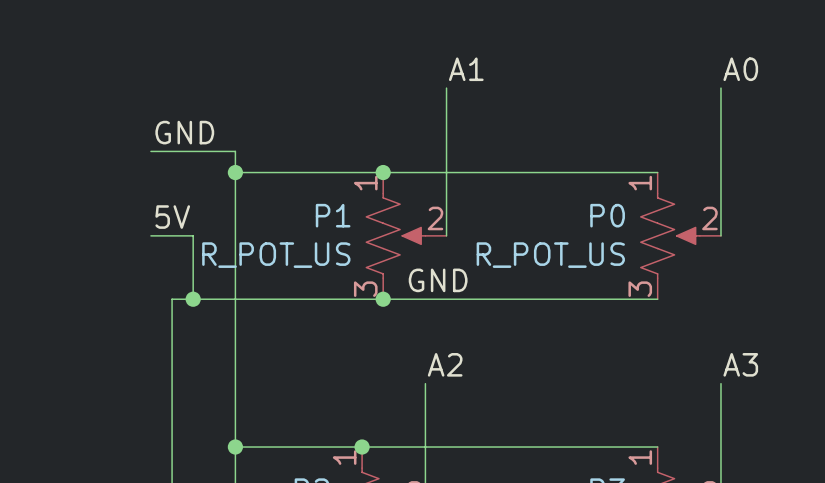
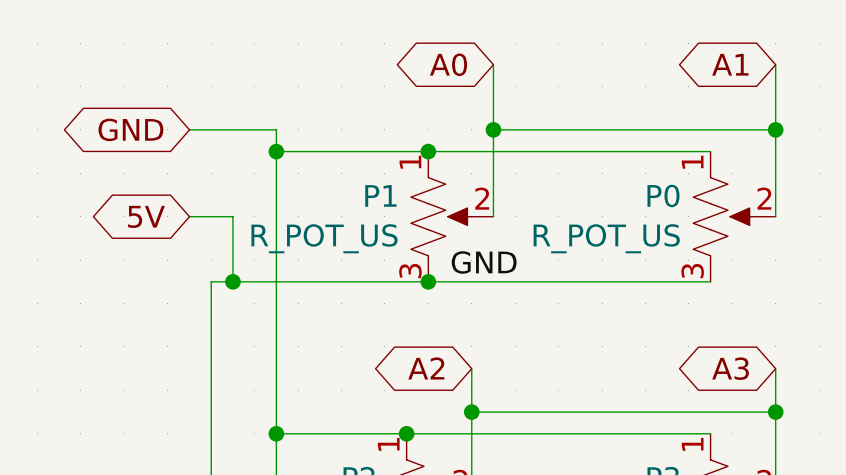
label: A1 (466, 69) -> none
label: A0 (740, 69) -> none
global label: none -> A0 (448, 64)
global label: none -> A1 (730, 64)
label: GND (184, 132) -> none
global label: none -> GND (130, 129)
wire: none -> (493, 129) (775, 129)
junction: none -> (493, 129)
junction: none -> (775, 129)
label: 5V (172, 217) -> none
global label: none -> 5V (146, 216)
label: A2 (445, 364) -> none
label: A3 (740, 364) -> none
global label: none -> A2 (426, 368)
global label: none -> A3 (730, 368)
wire: none -> (471, 412) (775, 412)
junction: none -> (471, 412)
junction: none -> (775, 412)

